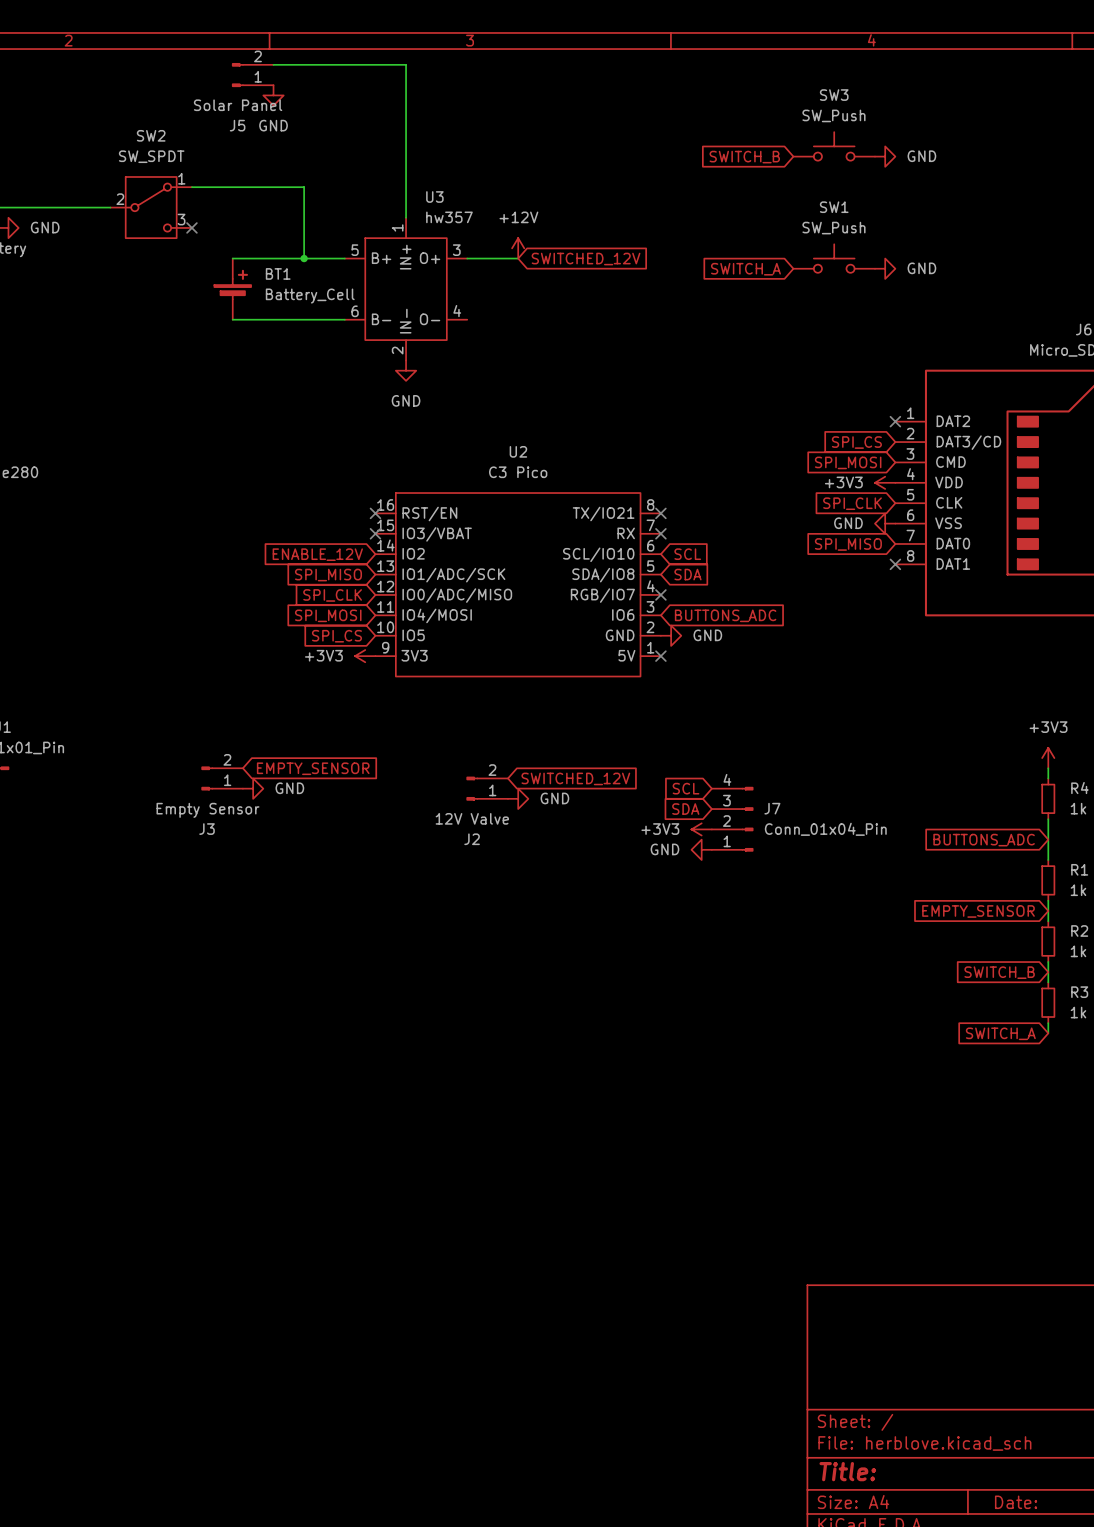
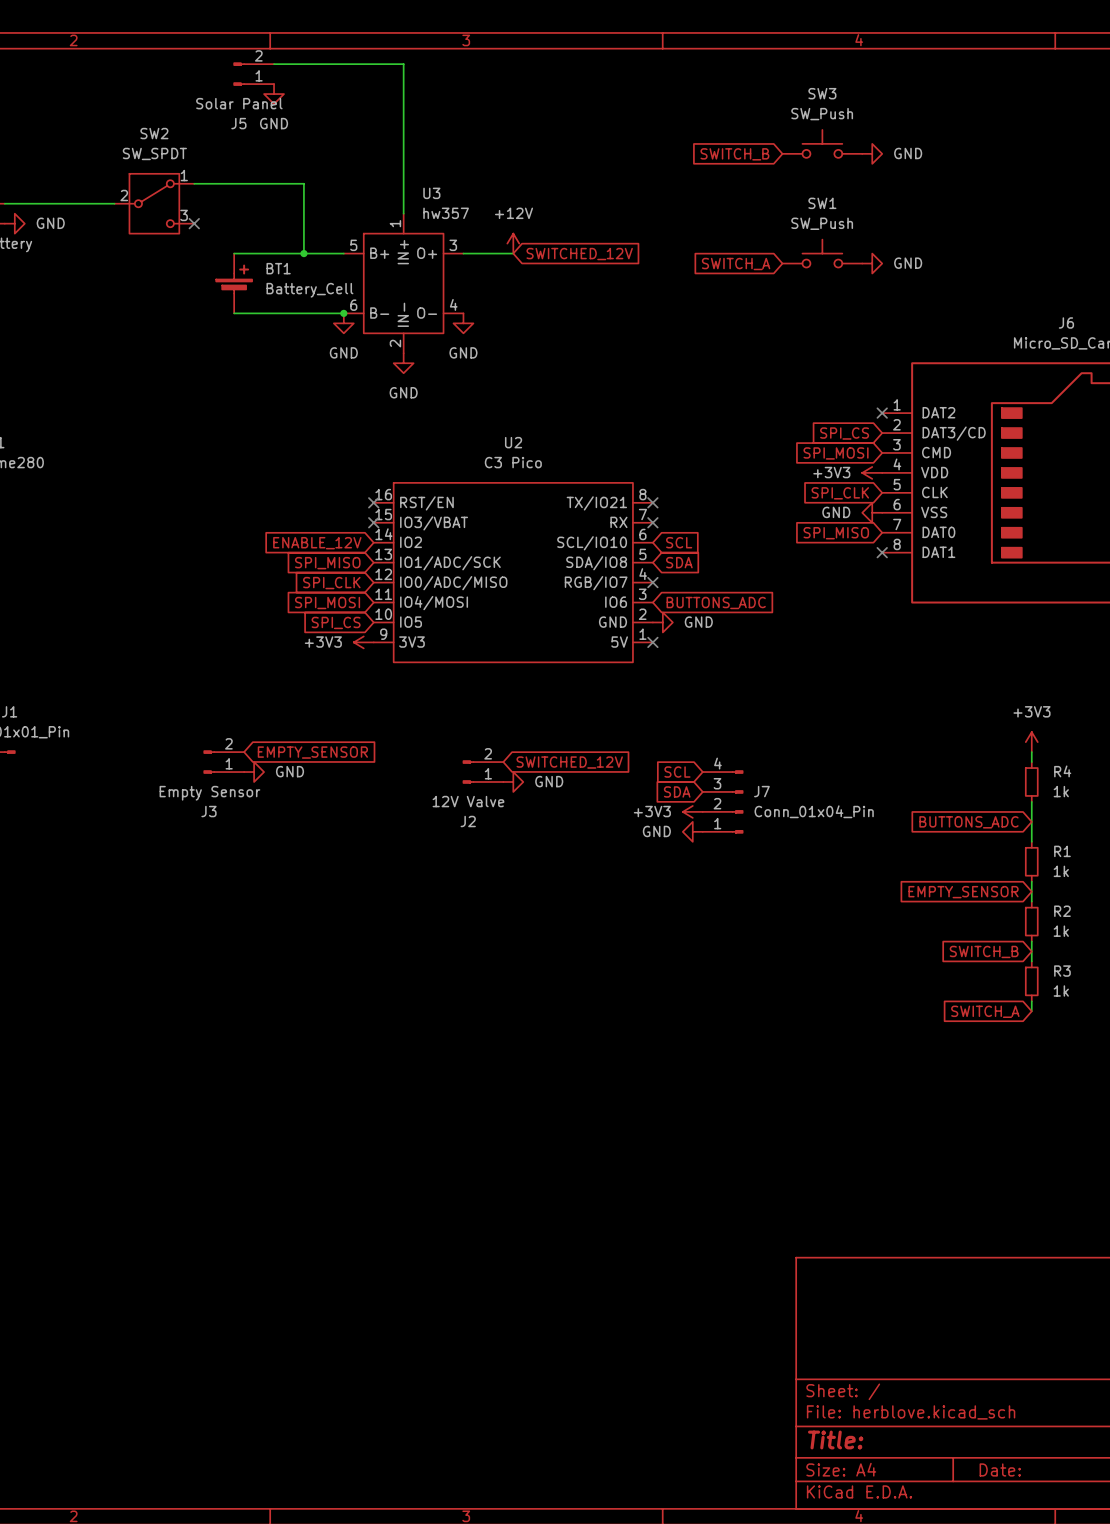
junction: none -> (343, 313)
power symbol: none -> GND (343, 323)
power symbol: none -> GND (463, 323)

